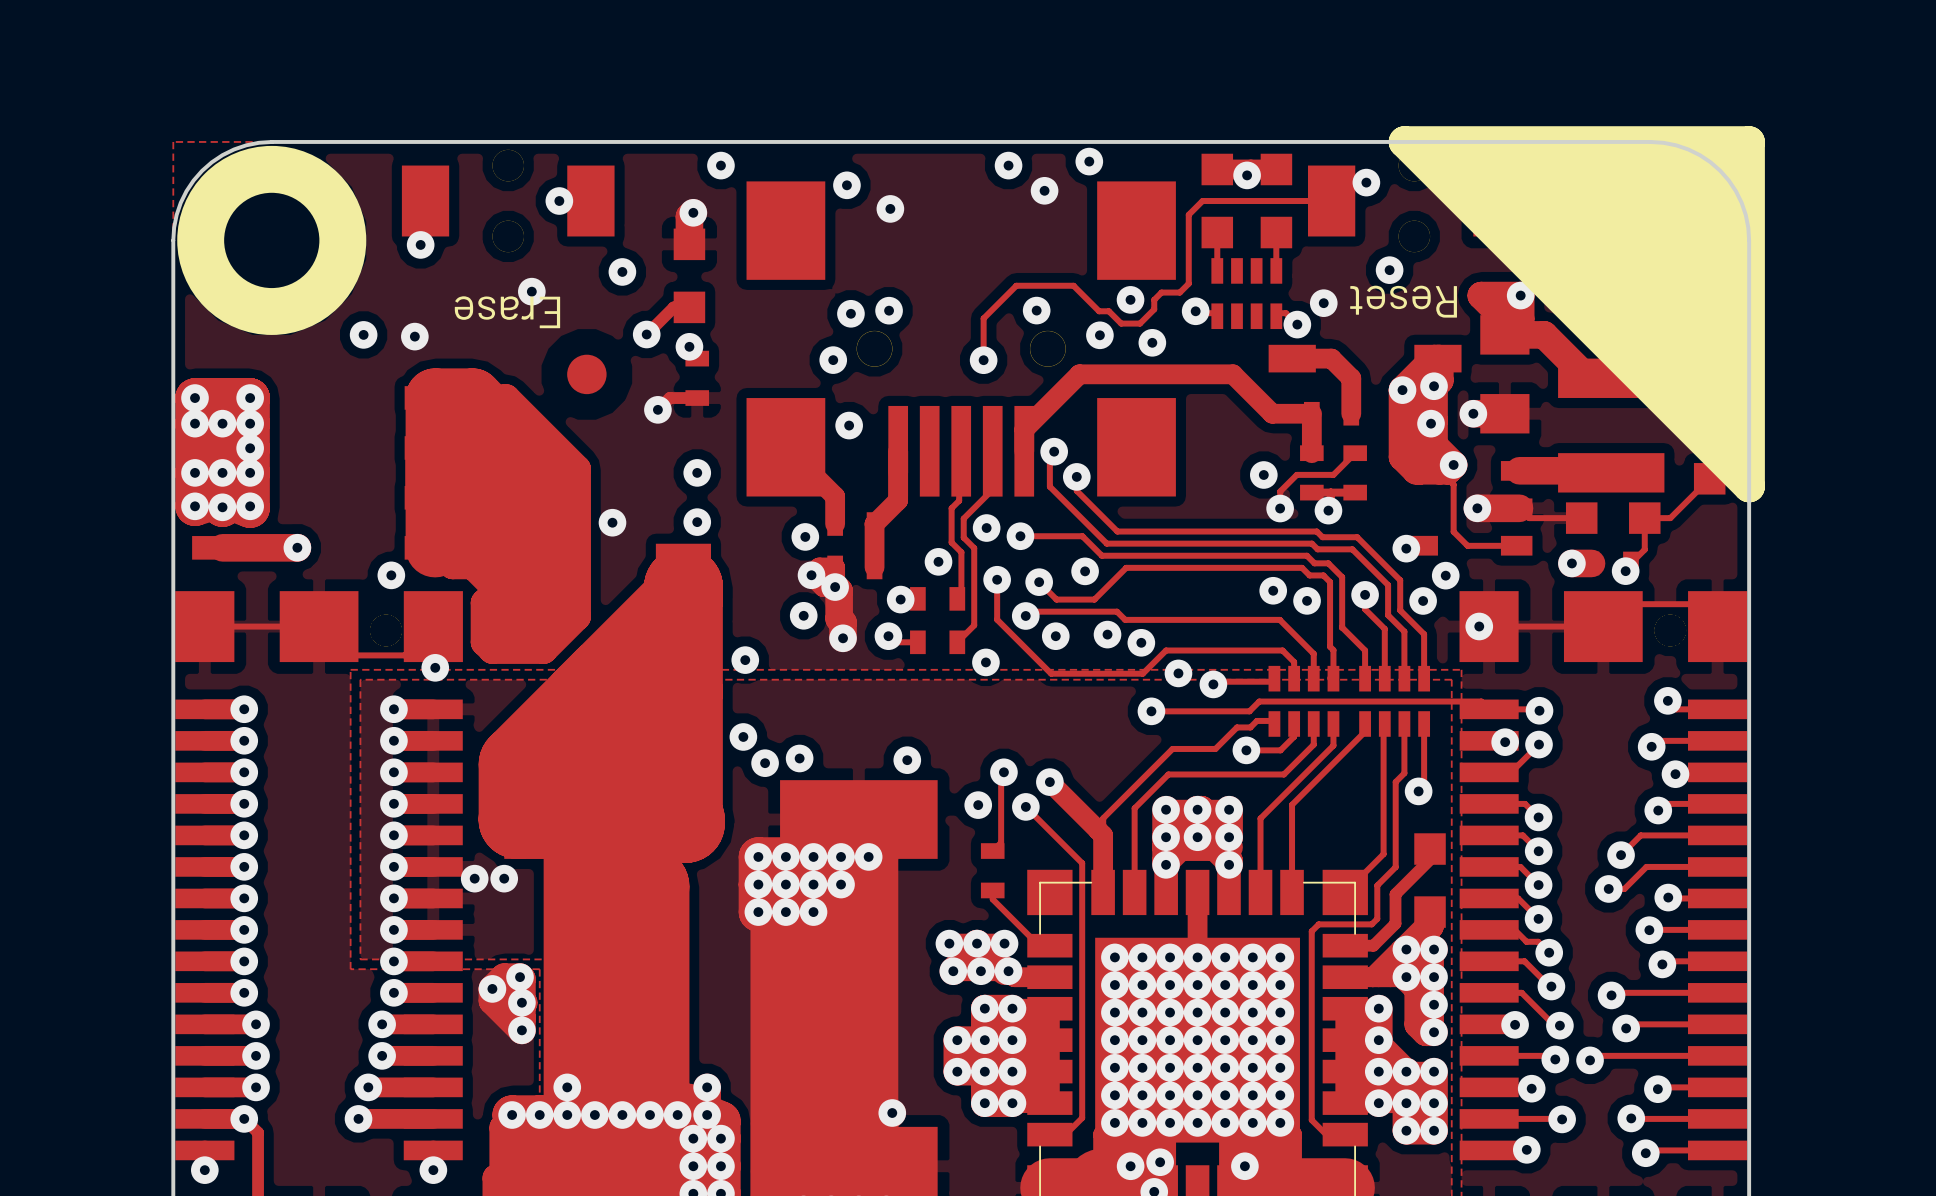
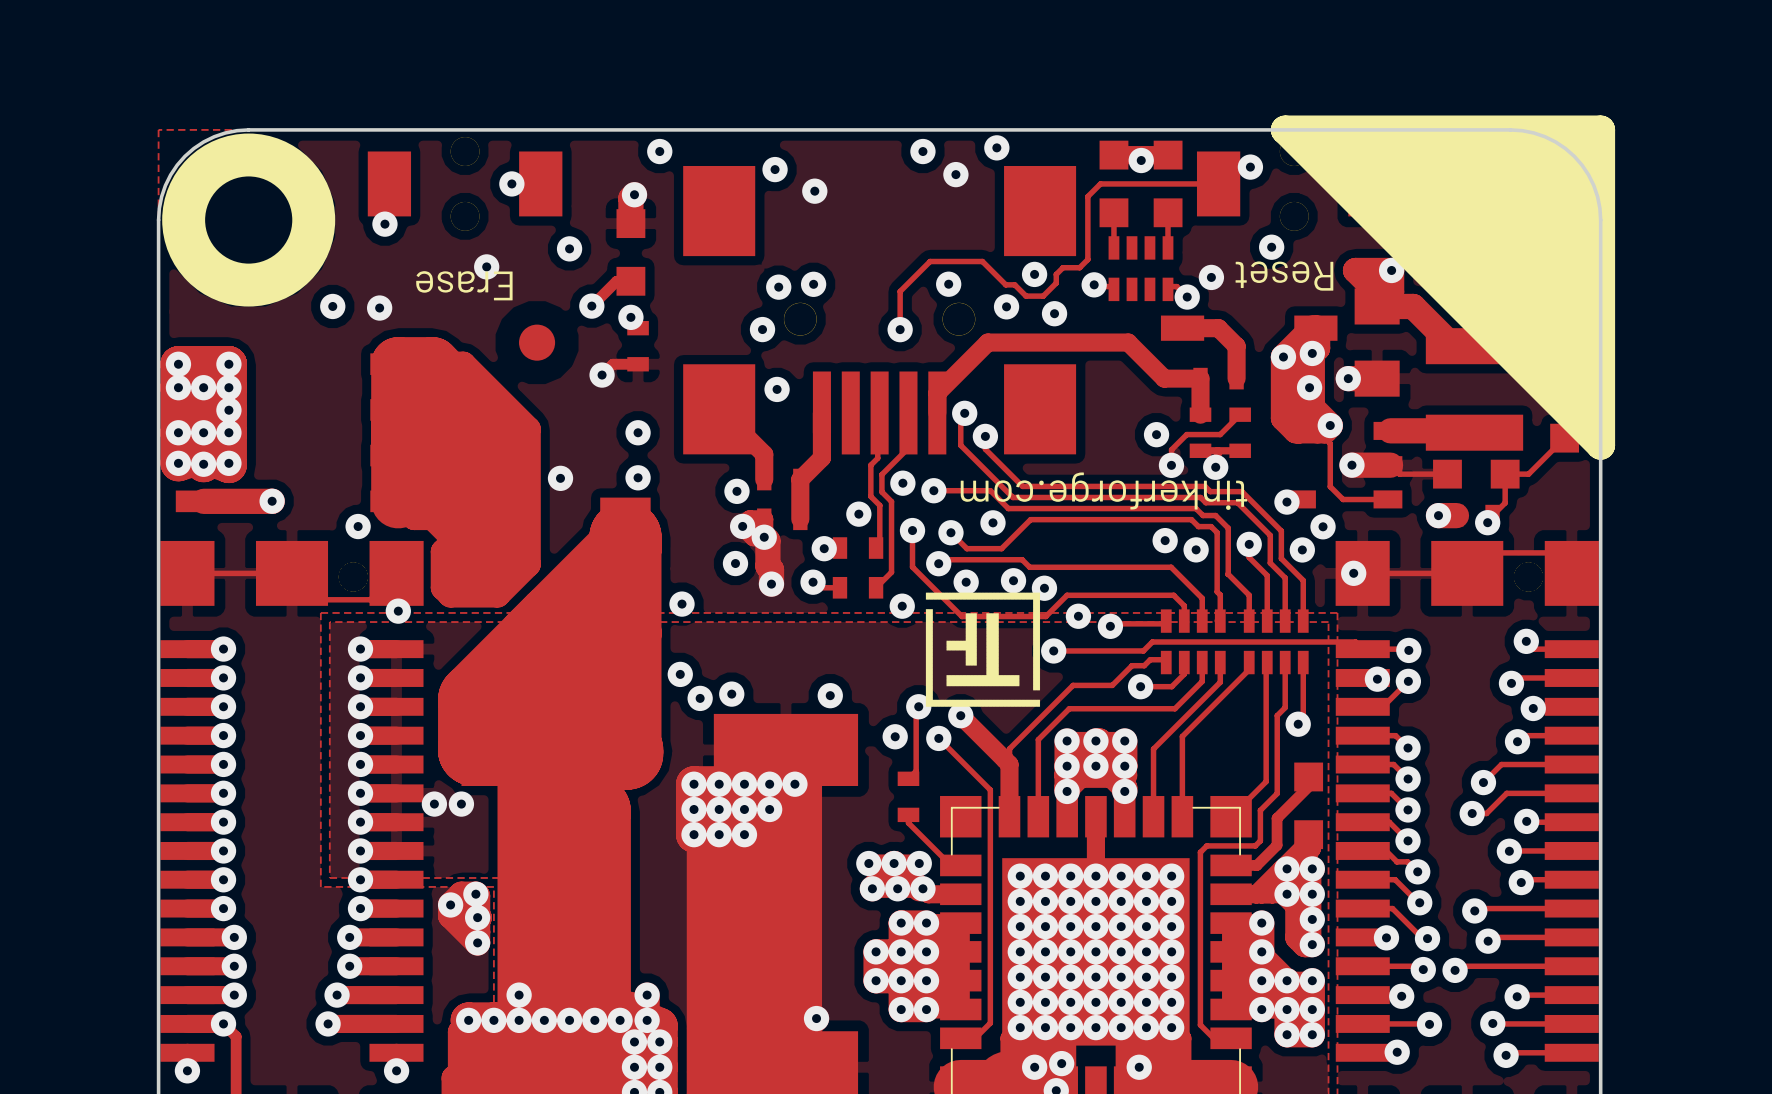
text: none -> tinkerforge.com (1103, 491)
drawing: none -> [925, 592, 1041, 707]

